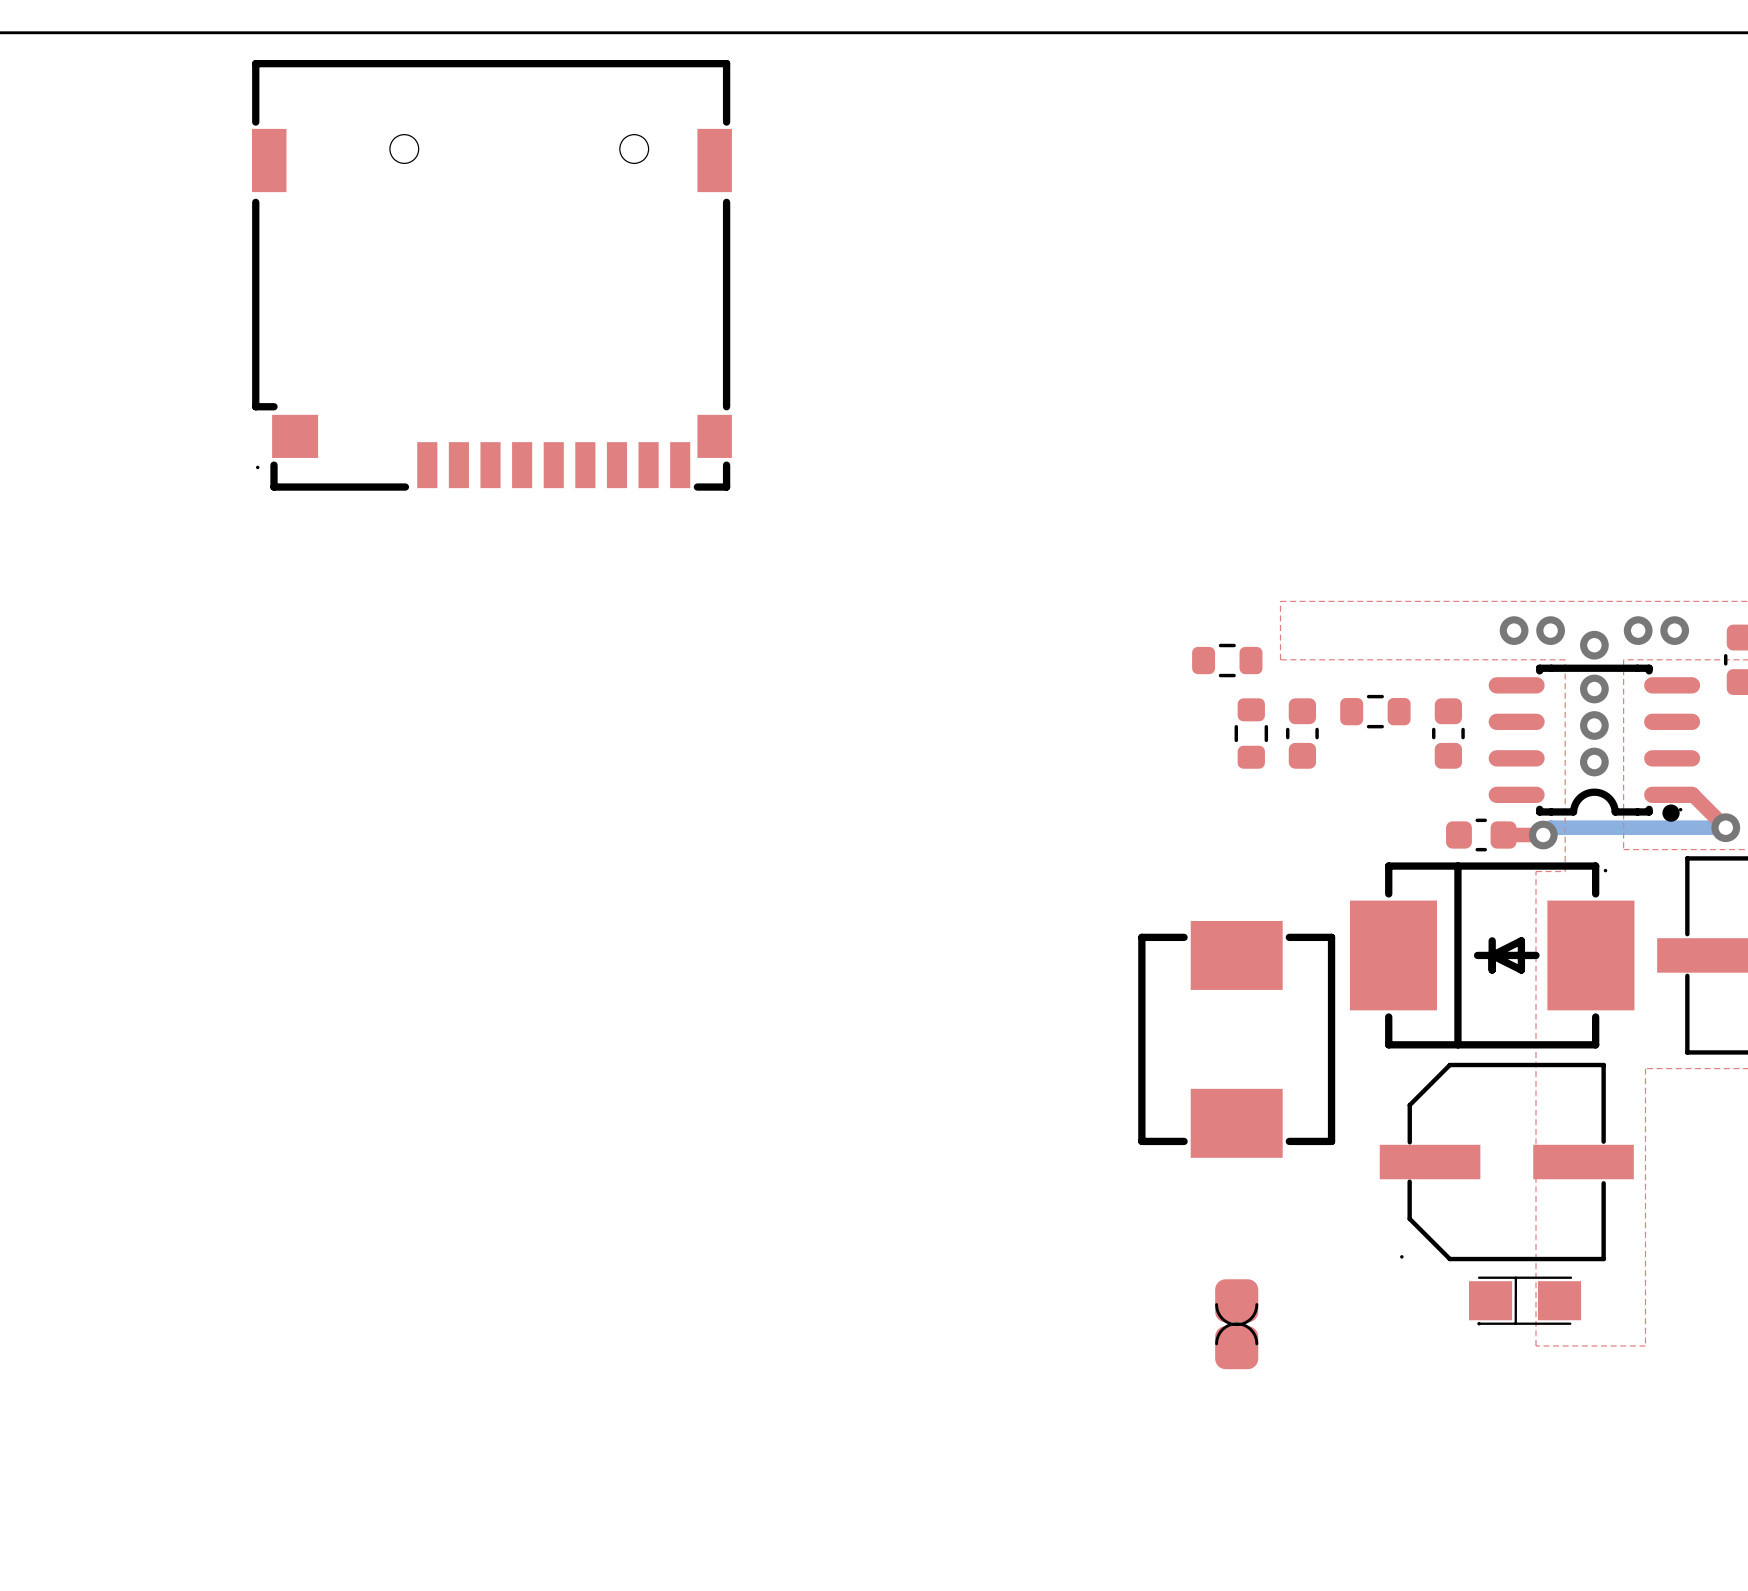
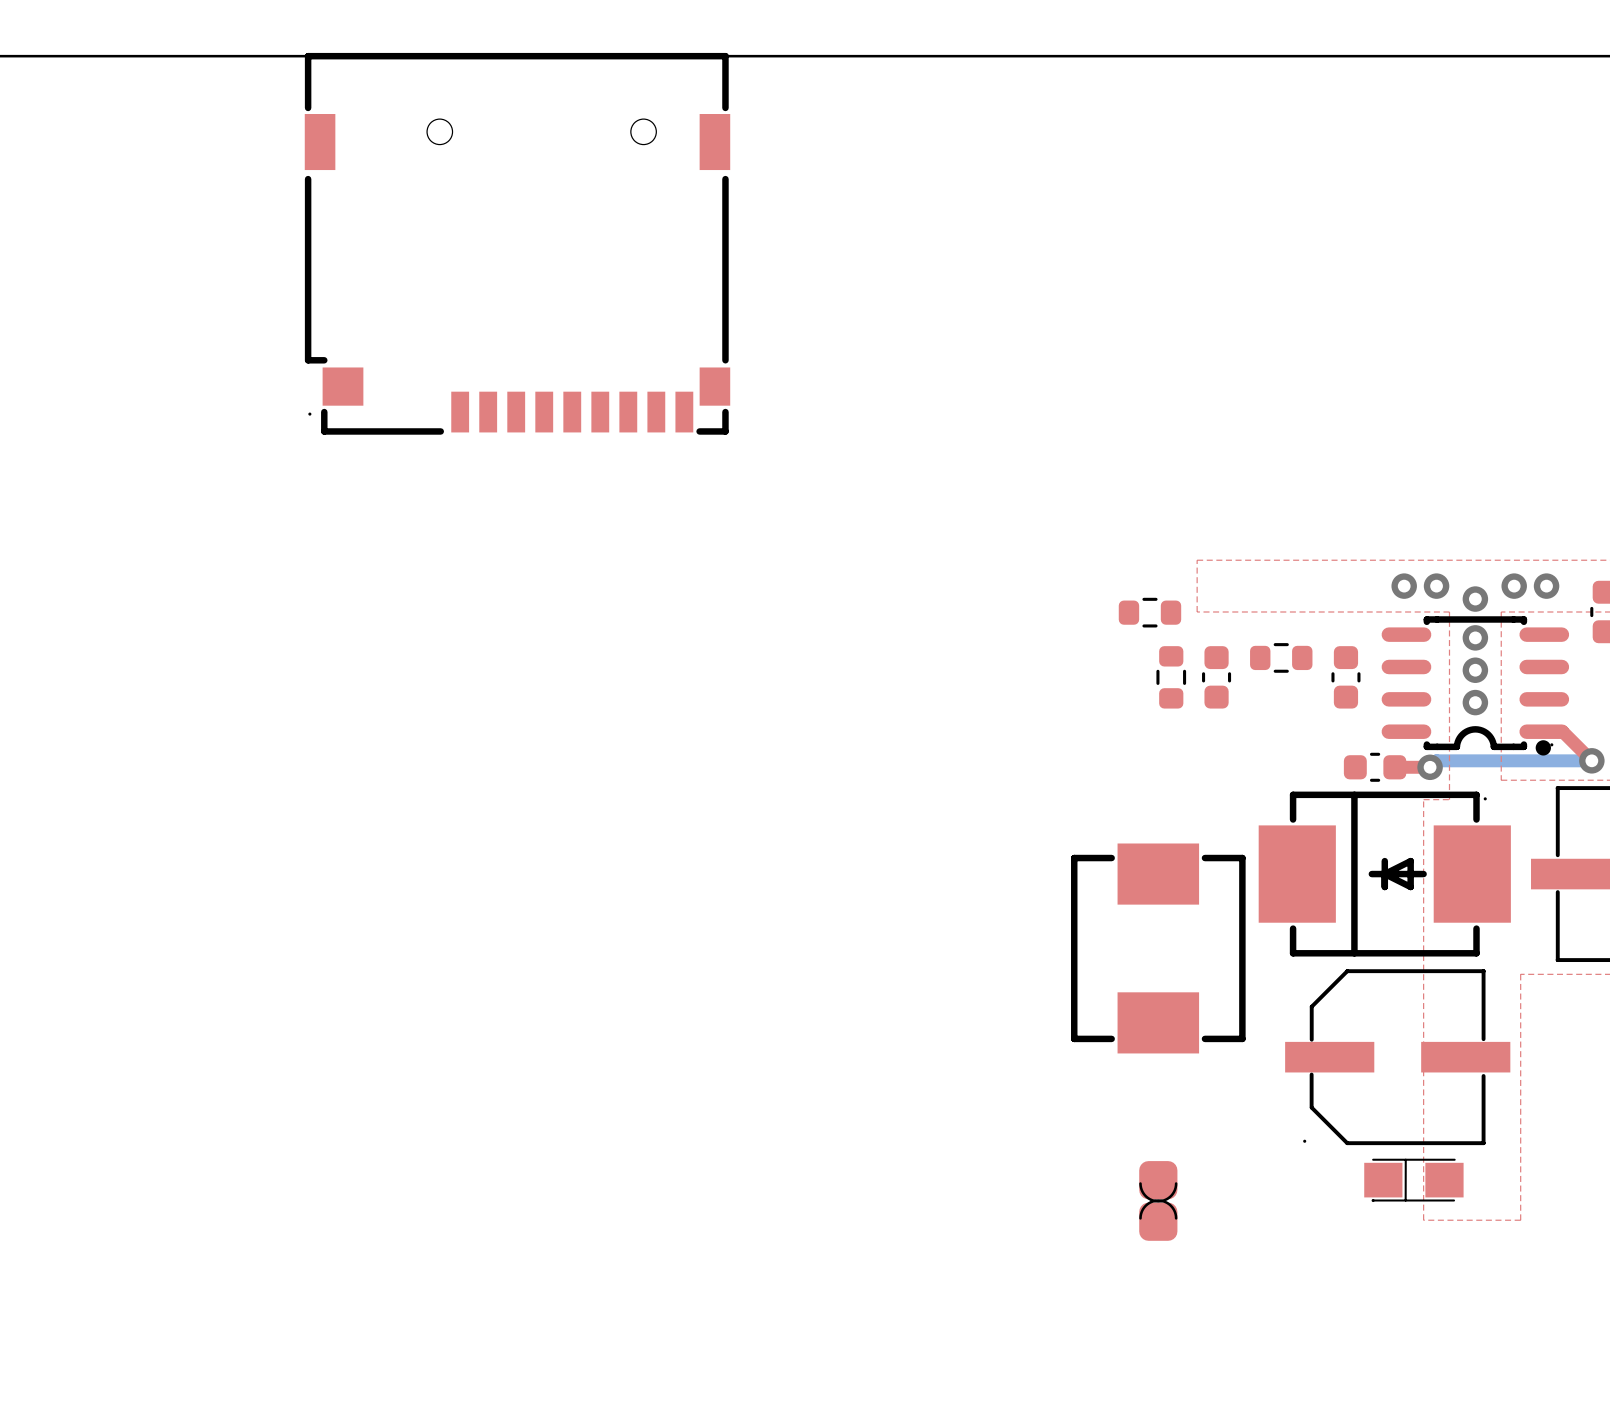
part position: (491, 275) -> (517, 243)

